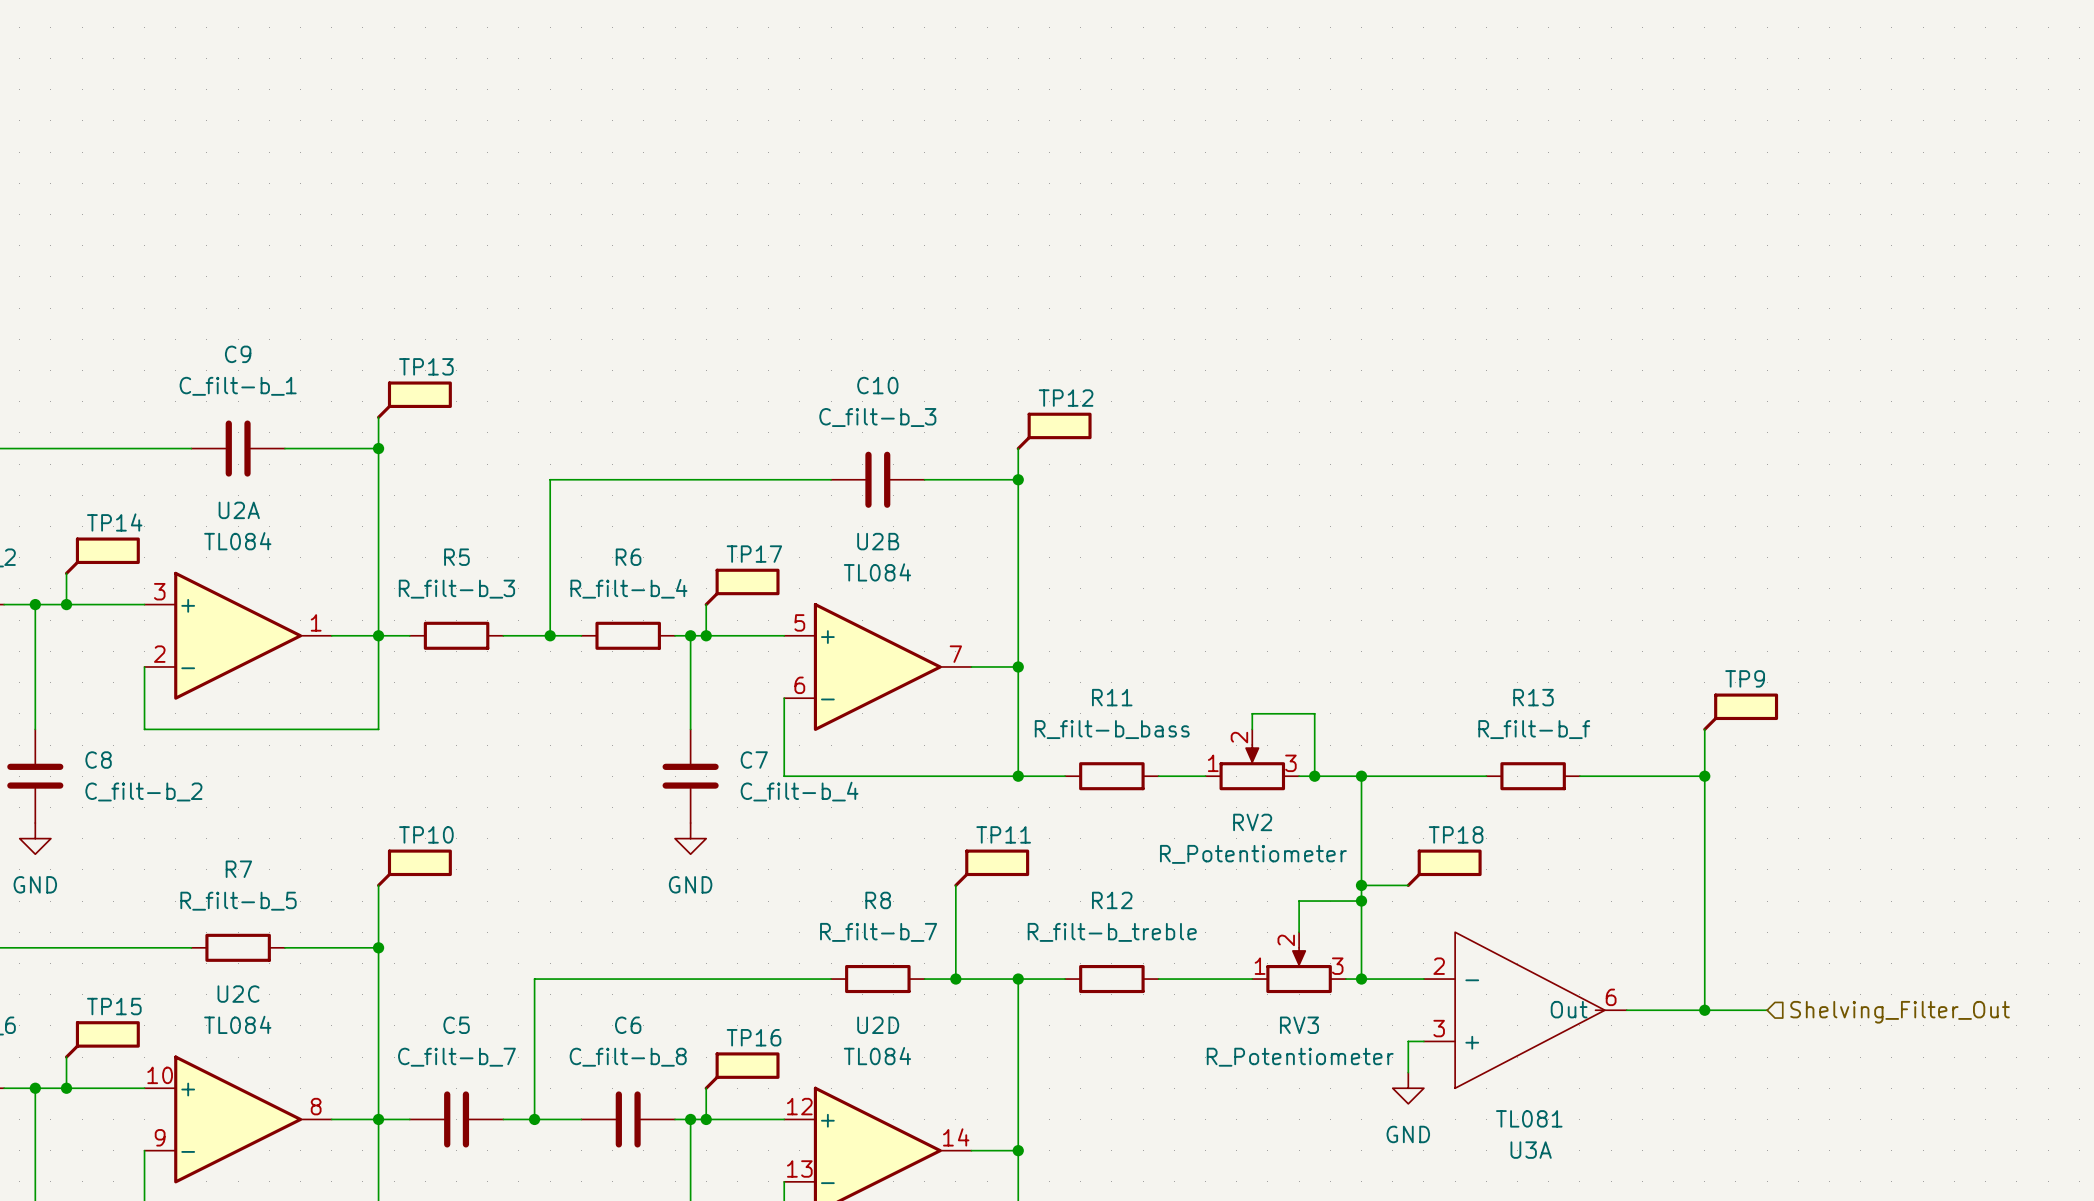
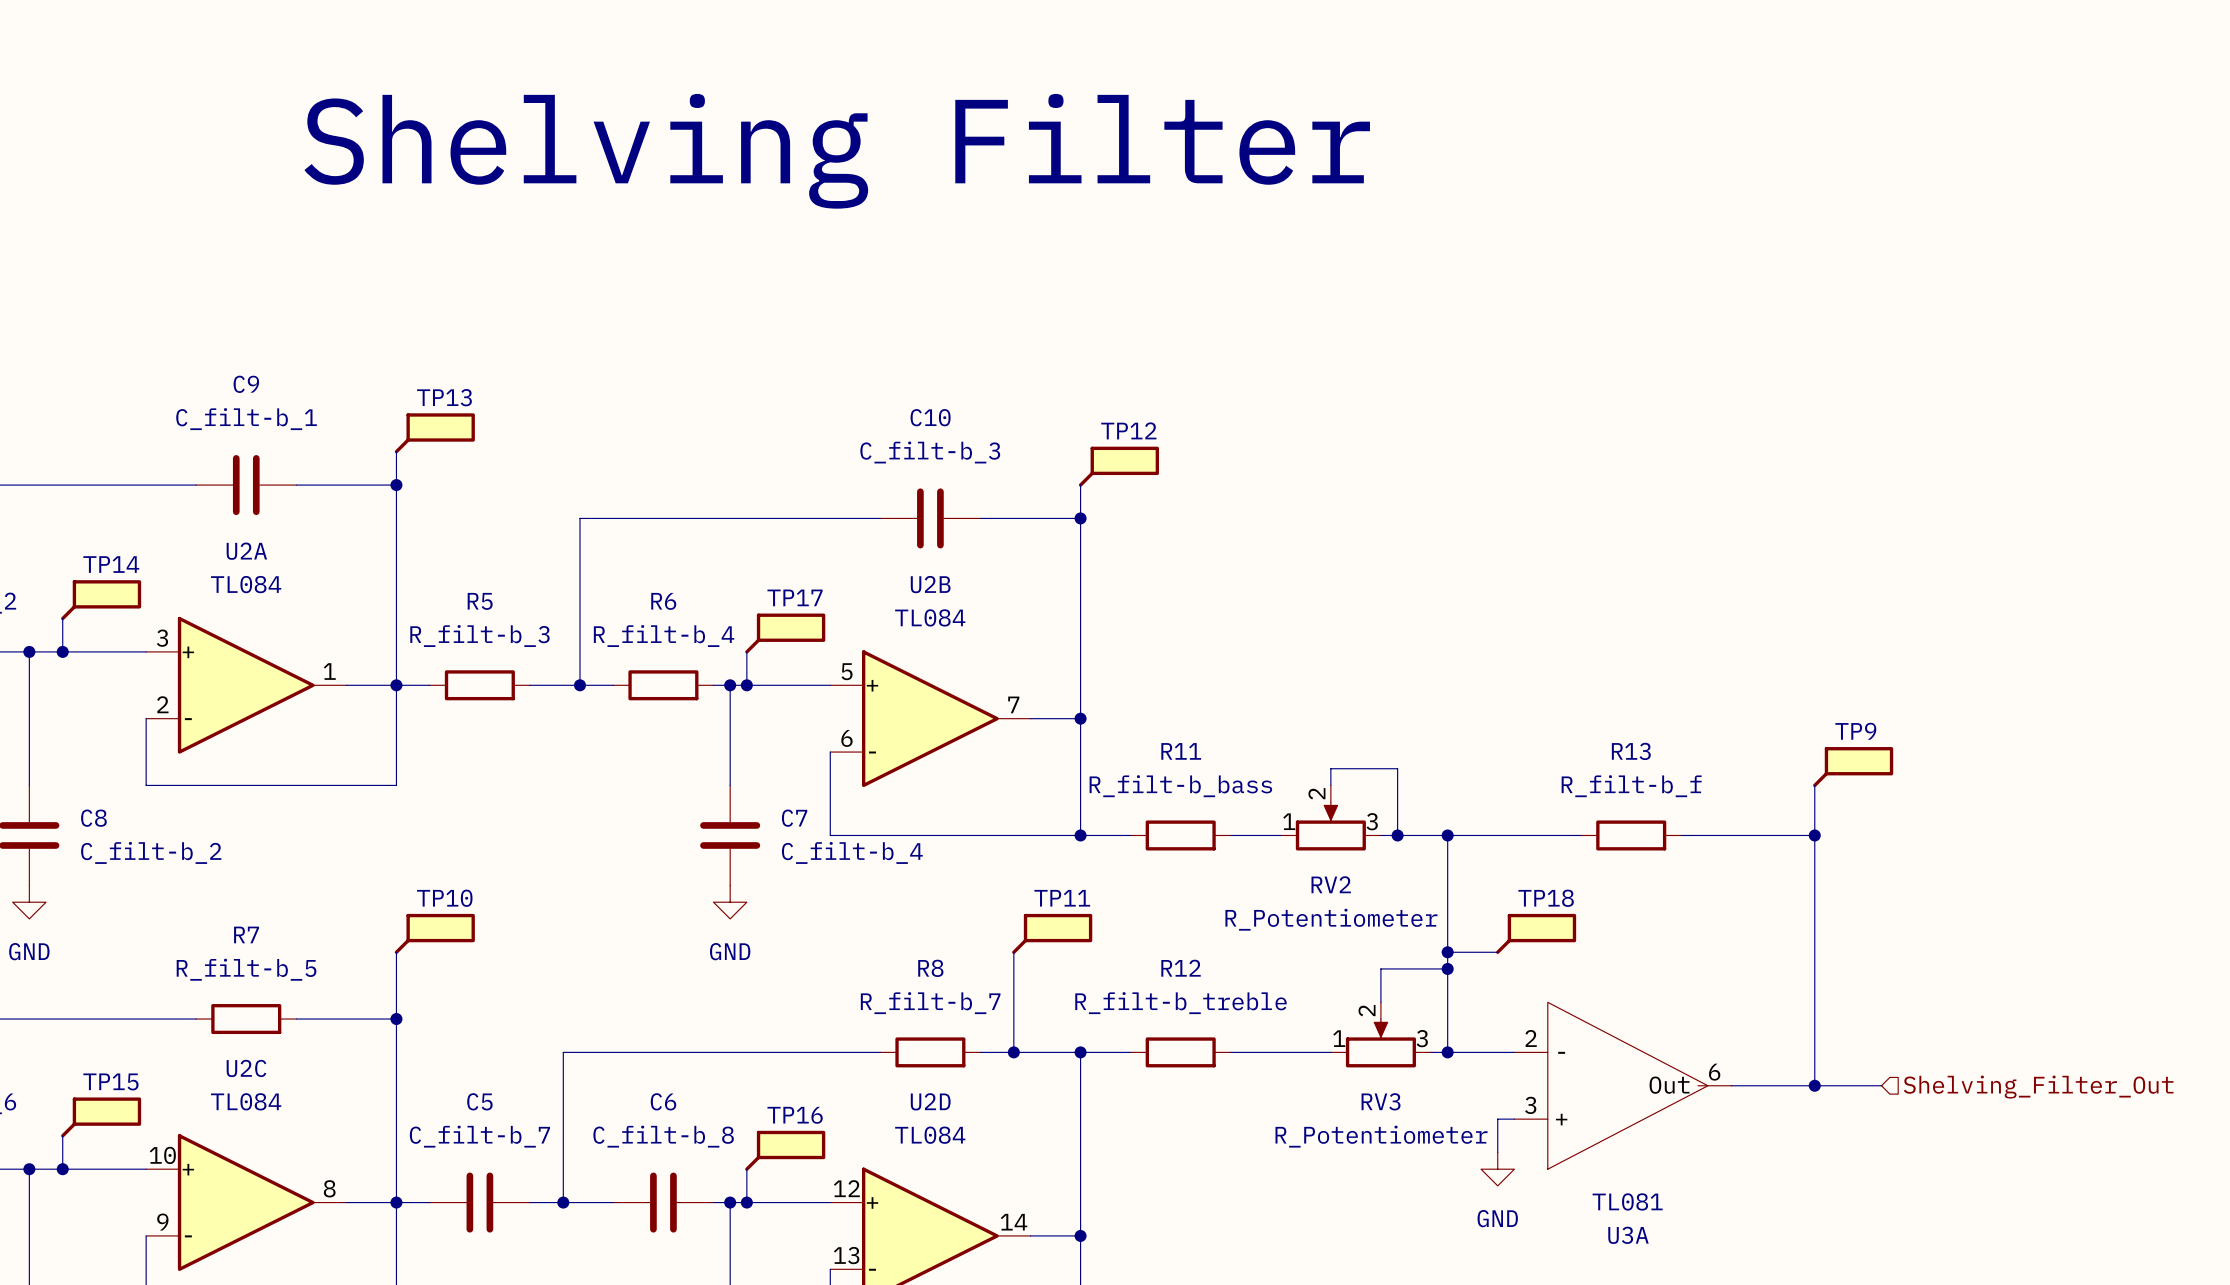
text: none -> Shelving Filter (837, 151)

